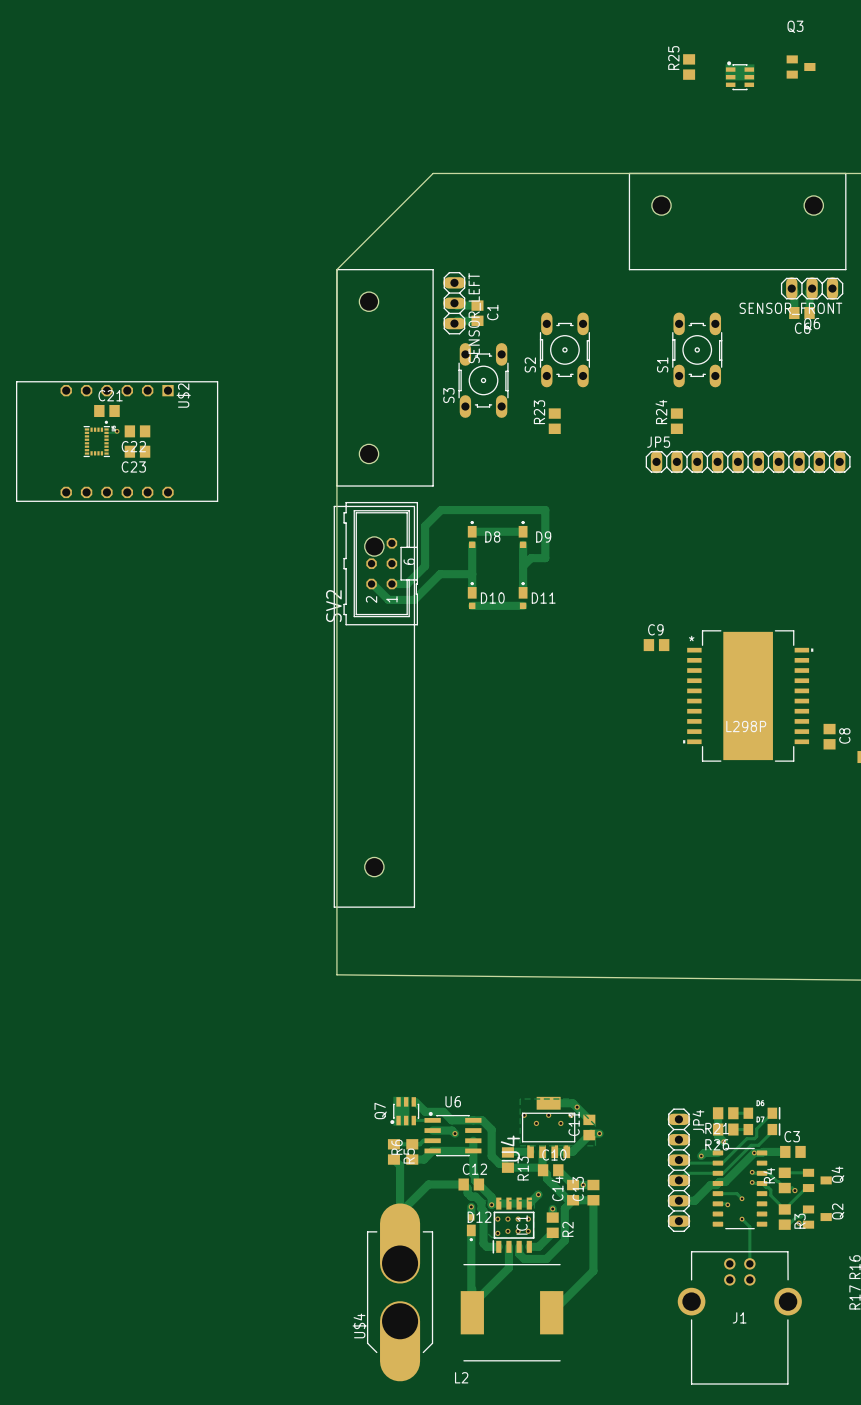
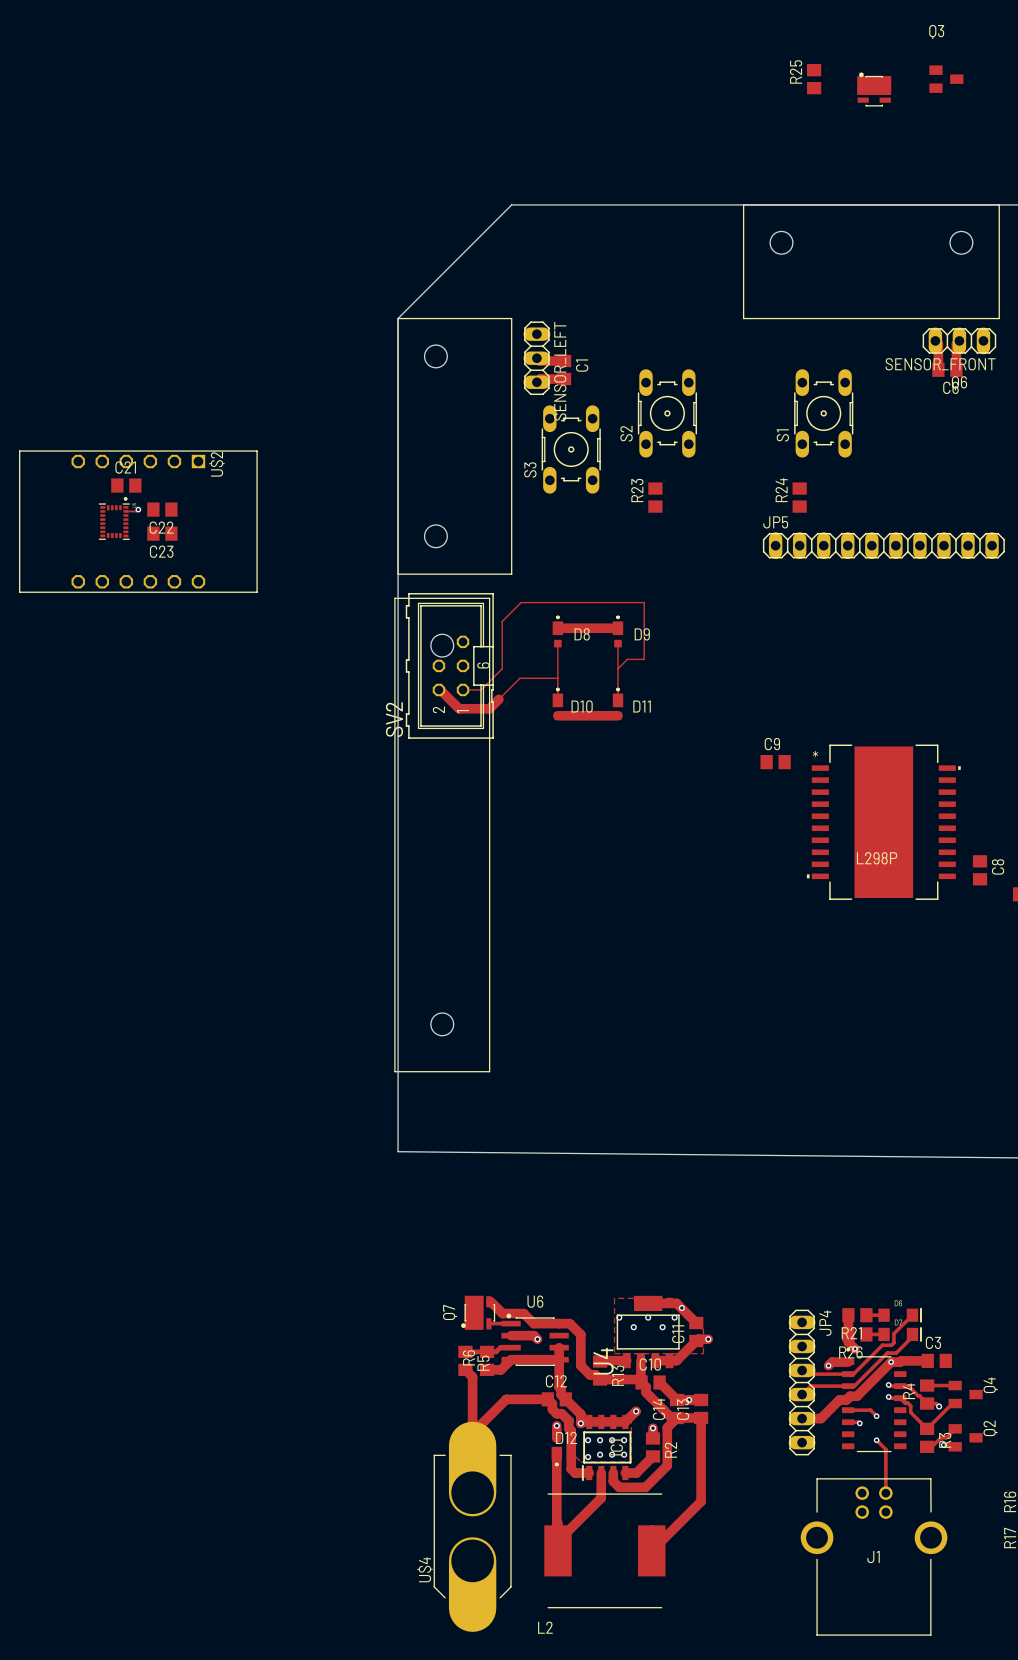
track width: thick (472, 544) (472, 592) -> thin (557, 643) (557, 700)
track width: thick (523, 544) (523, 592) -> thin (617, 643) (617, 700)
track width: thick (523, 566) (531, 558) (545, 558) (545, 510) (441, 510) (425, 526) (425, 566) (407, 584) (391, 584) -> thin (617, 668) (627, 659) (644, 659) (644, 602) (521, 602) (502, 621) (502, 668) (481, 689) (463, 689)
track width: thick (472, 574) (440, 574) (422, 591) -> thin (557, 678) (519, 678) (498, 699)

